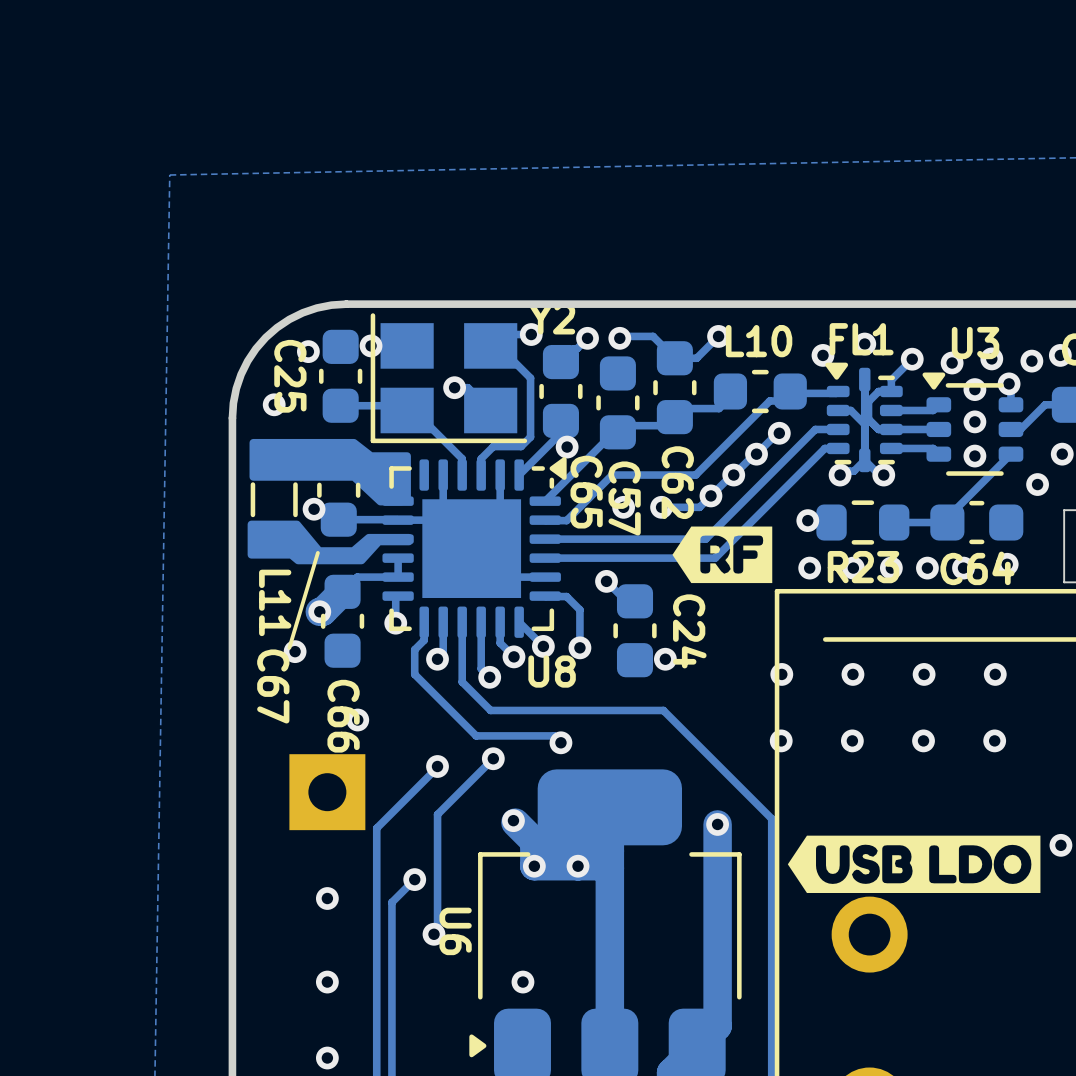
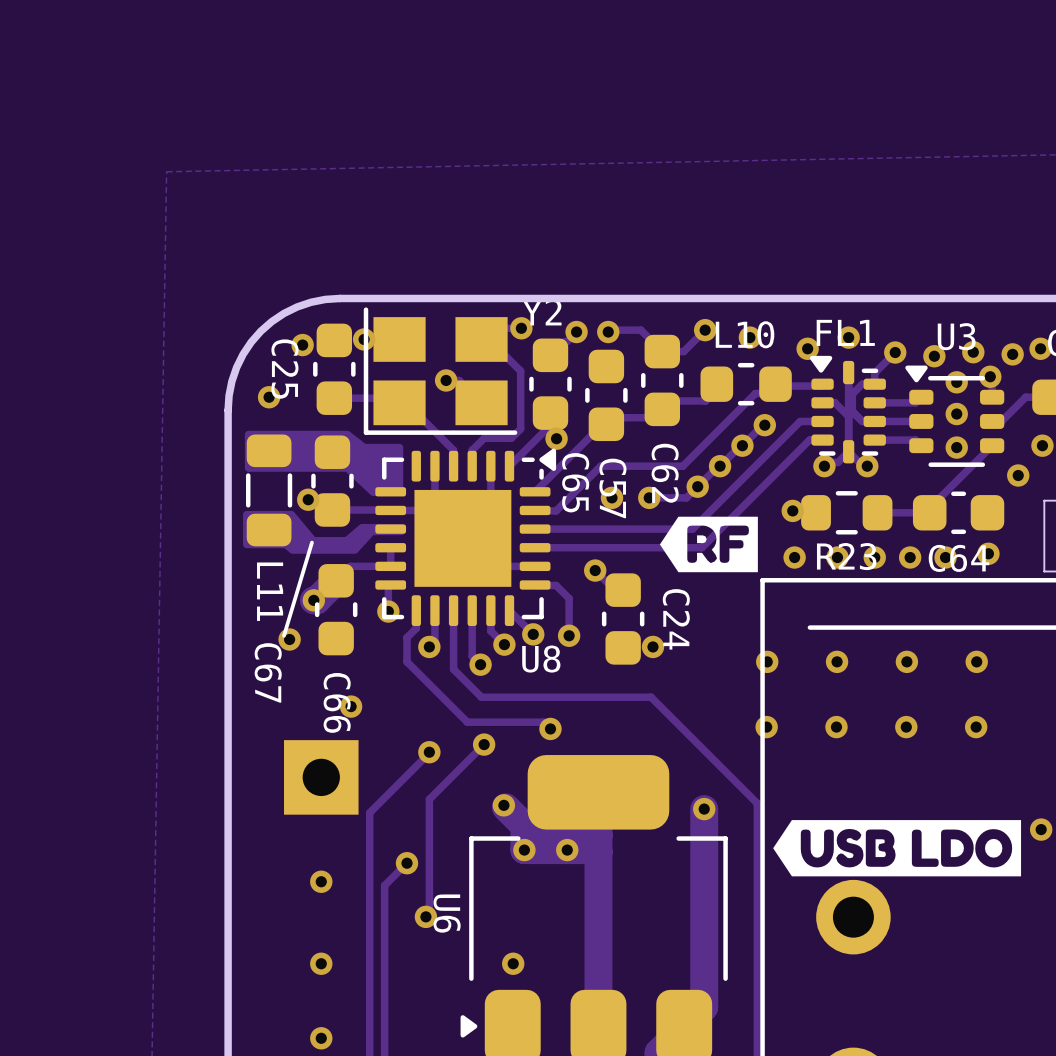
via: none -> (749, 337)

